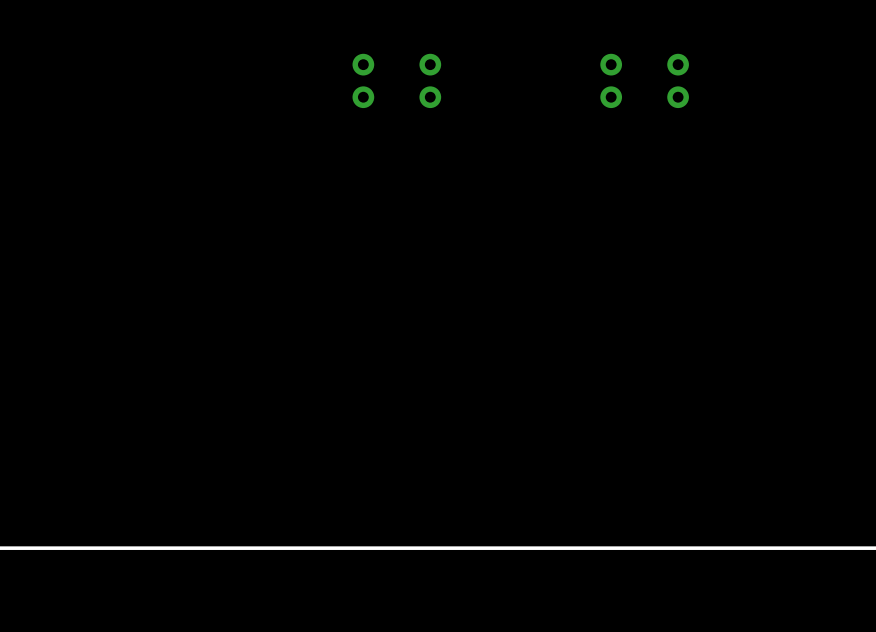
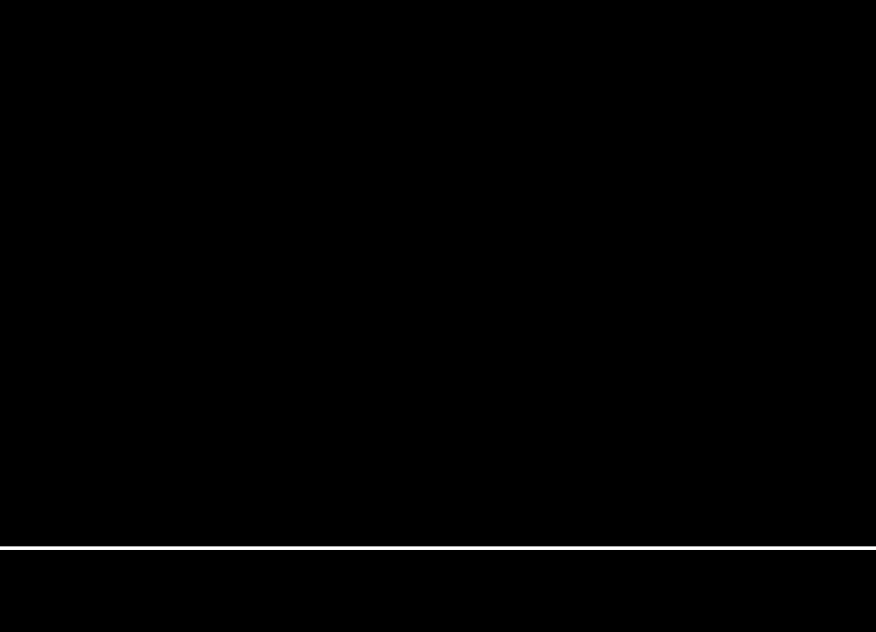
via: (363, 64) -> none
via: (430, 64) -> none
via: (611, 64) -> none
via: (678, 64) -> none
via: (363, 97) -> none
via: (430, 97) -> none
via: (611, 97) -> none
via: (678, 97) -> none

